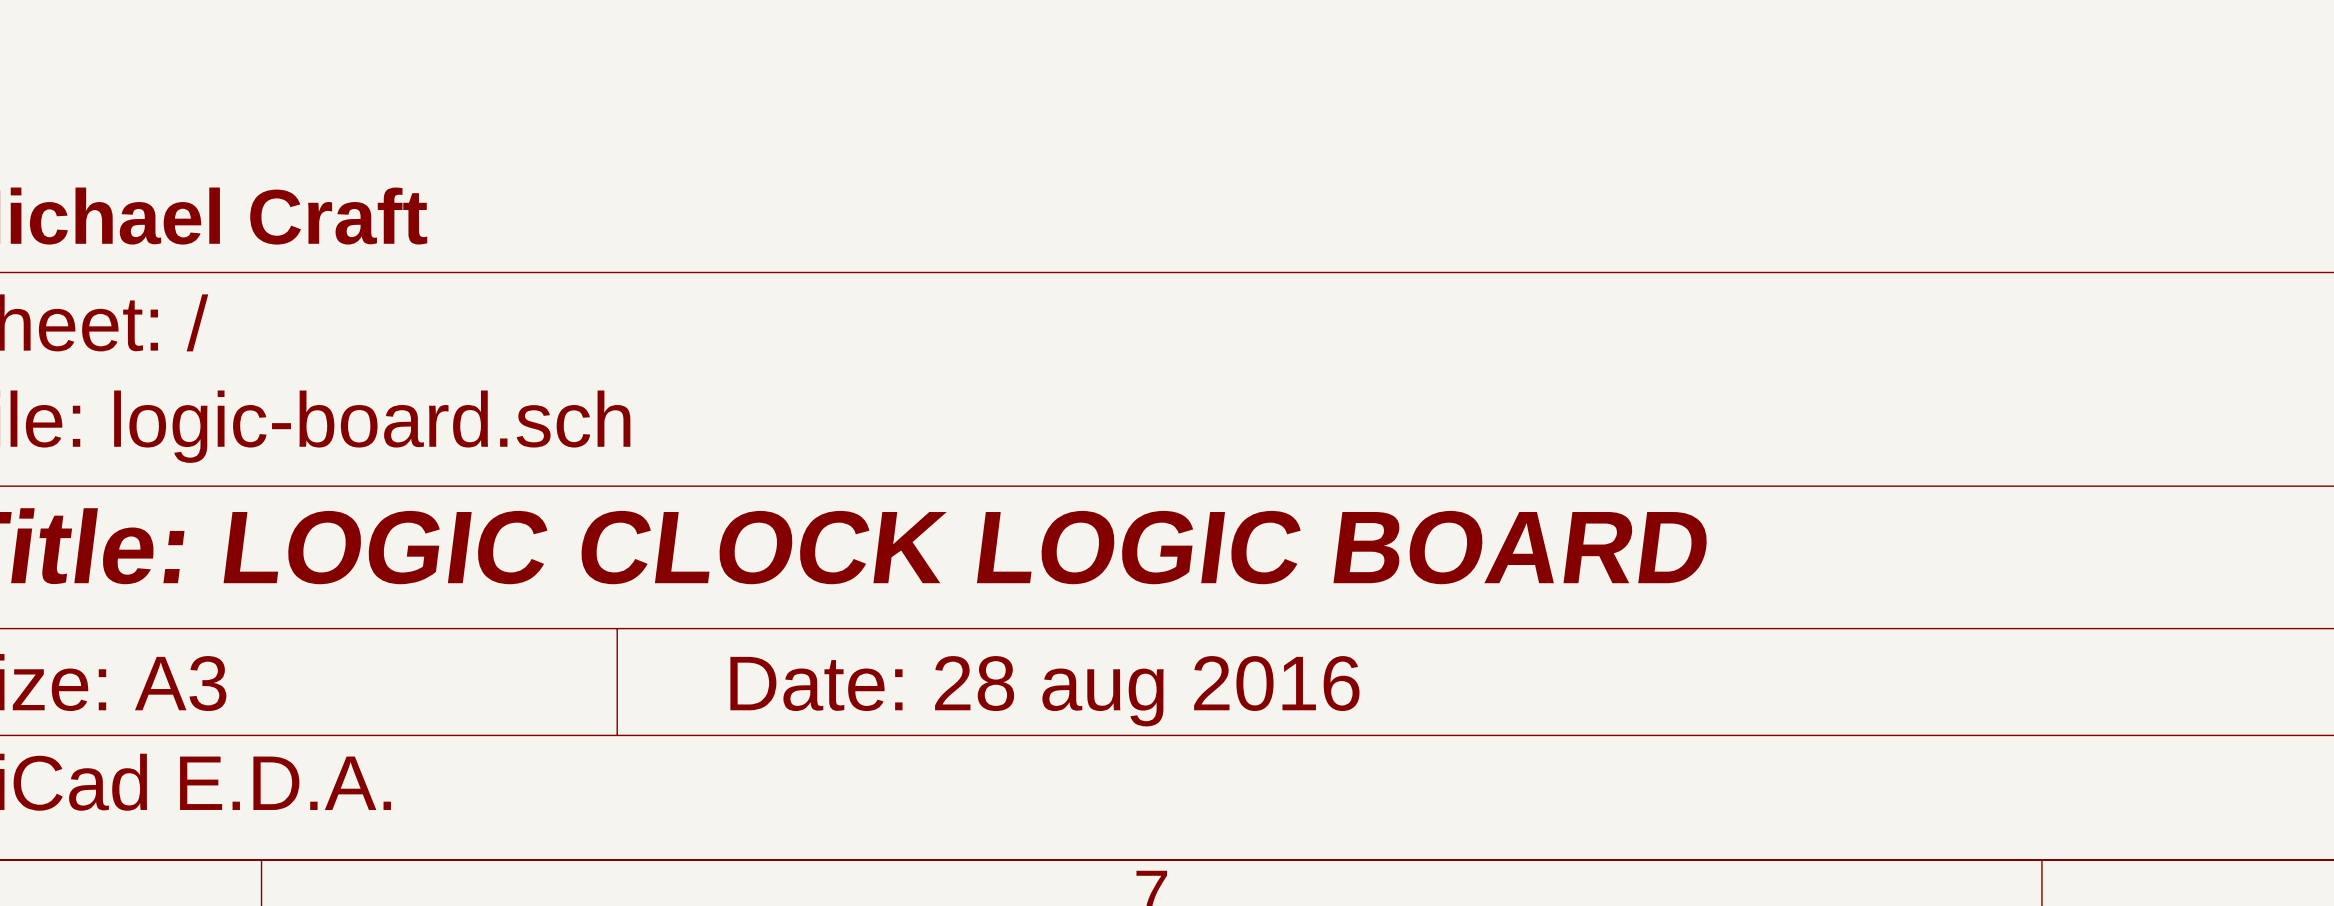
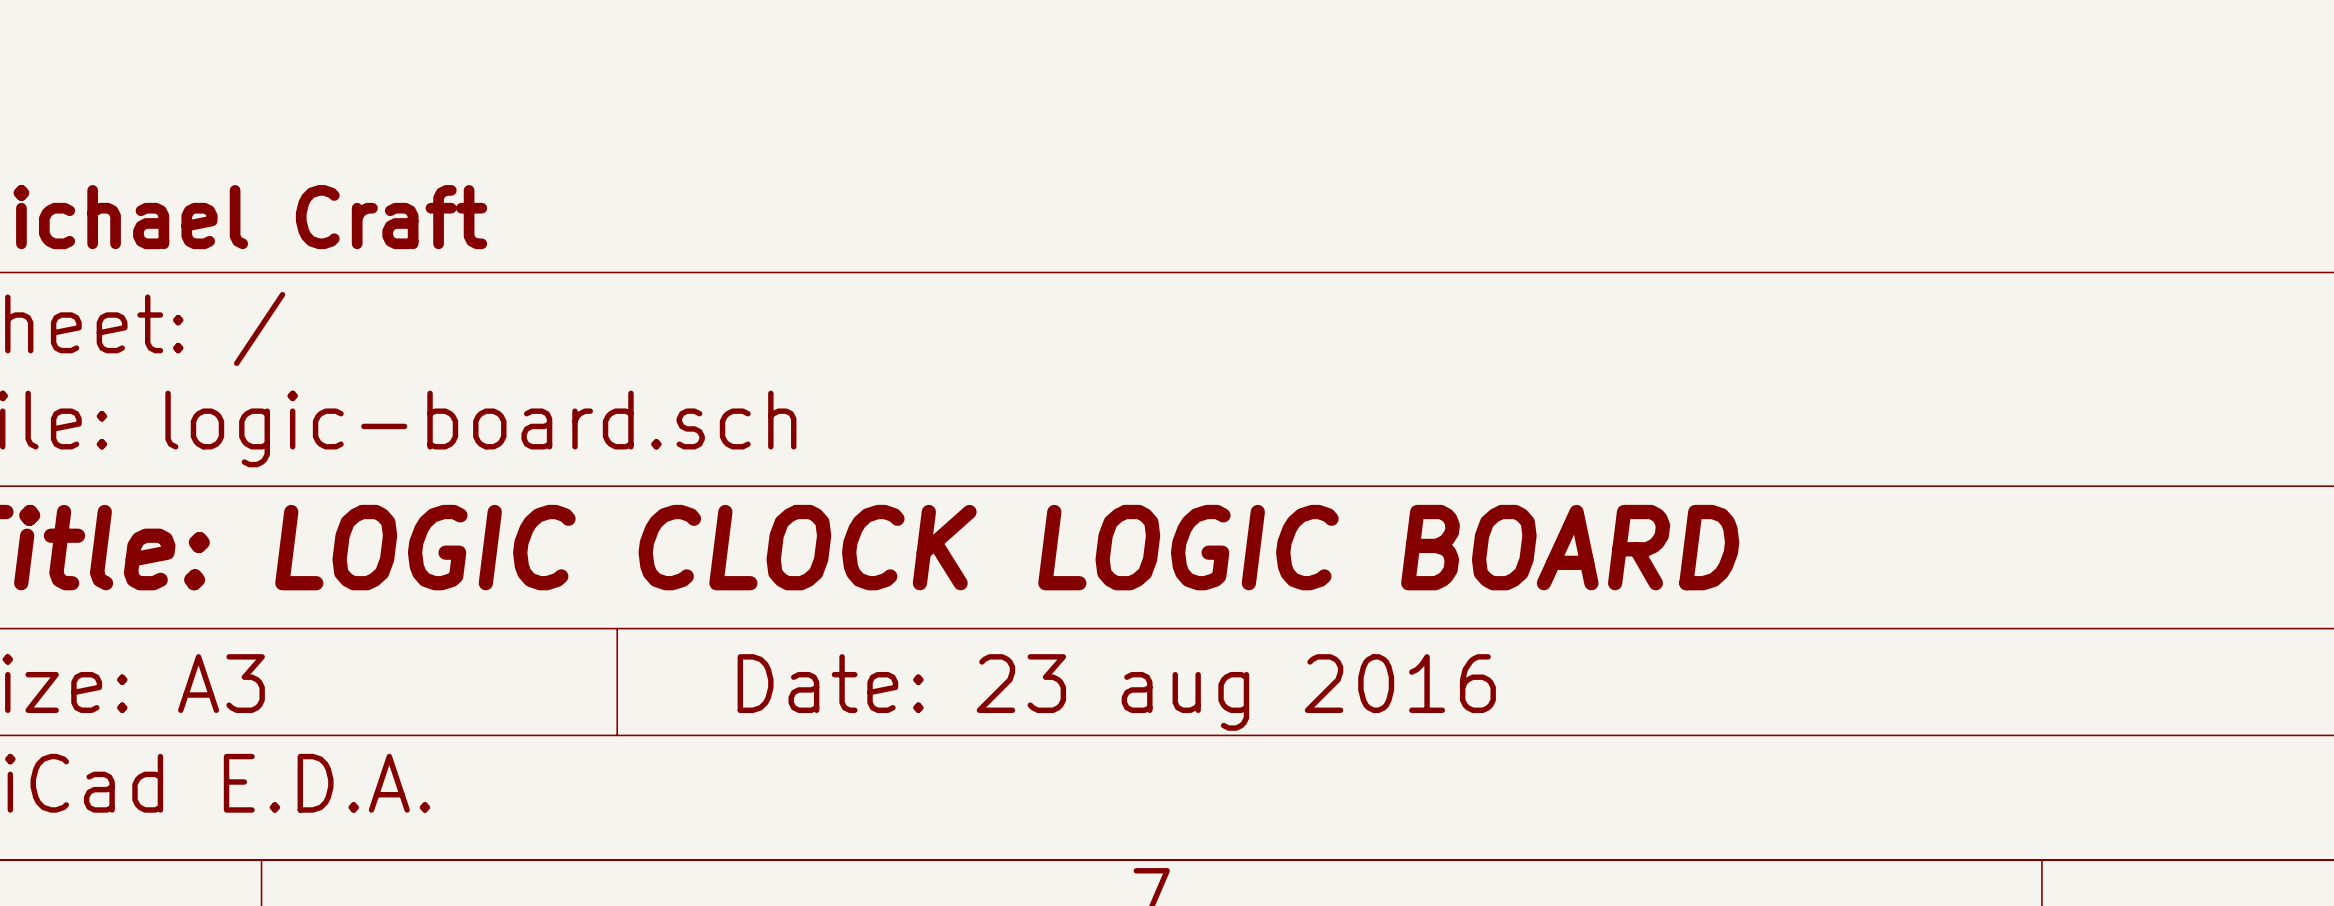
title block: Date: 28 aug 2016 (1044, 691) -> Date: 23 aug 2016 (1116, 692)

